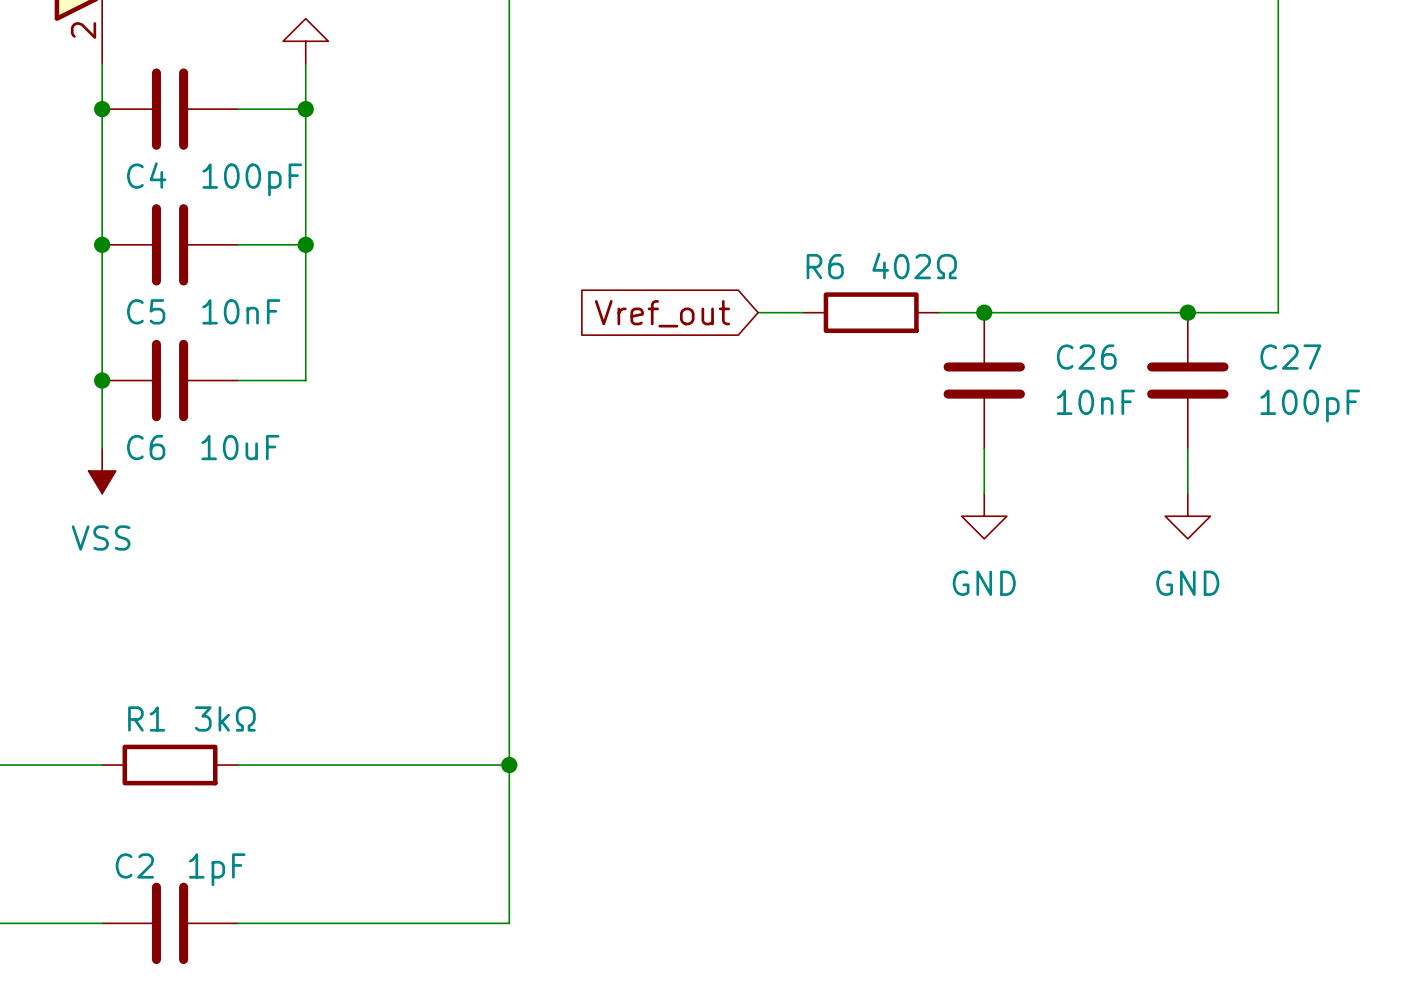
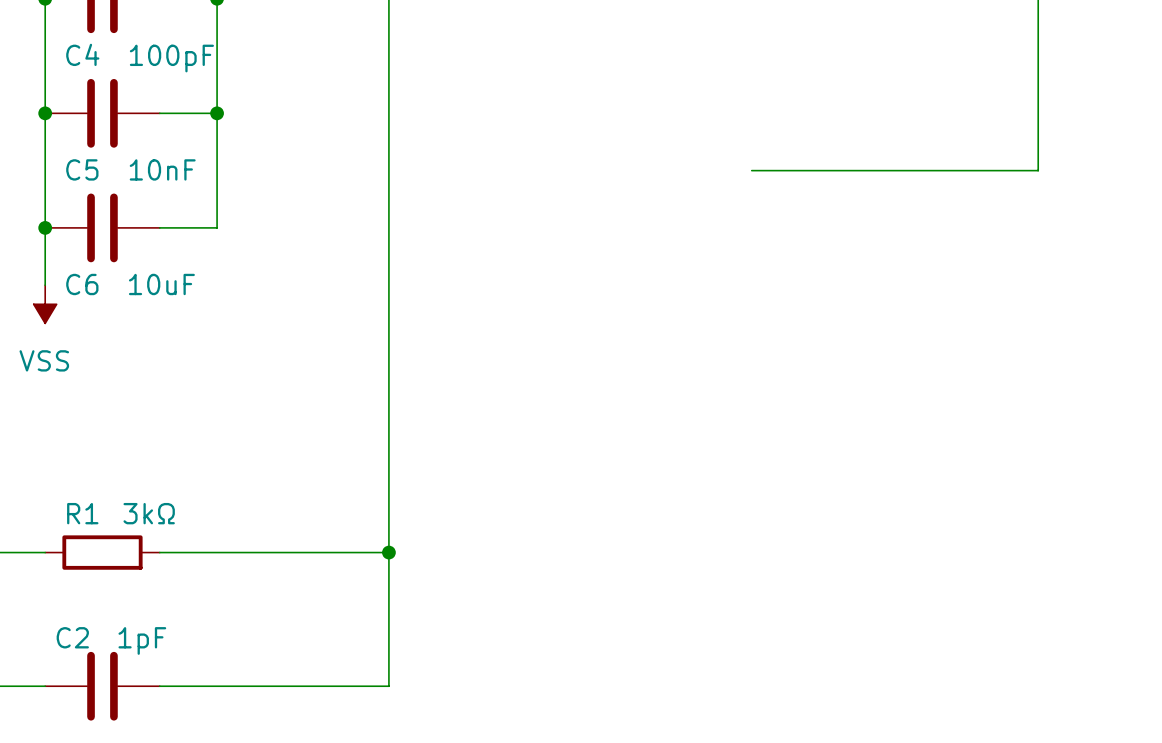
wire: (758, 312) (803, 312) -> none
R6: 402Ω (871, 312) -> none
junction: (984, 312) -> none
junction: (1187, 312) -> none
global label: Vref_out (662, 313) -> none
C26: 10nF (984, 380) -> none
C27: 100pF (1187, 380) -> none
wire: (984, 448) (984, 493) -> none
wire: (1187, 448) (1187, 493) -> none
power symbol: GND (984, 516) -> none
power symbol: GND (1187, 516) -> none

